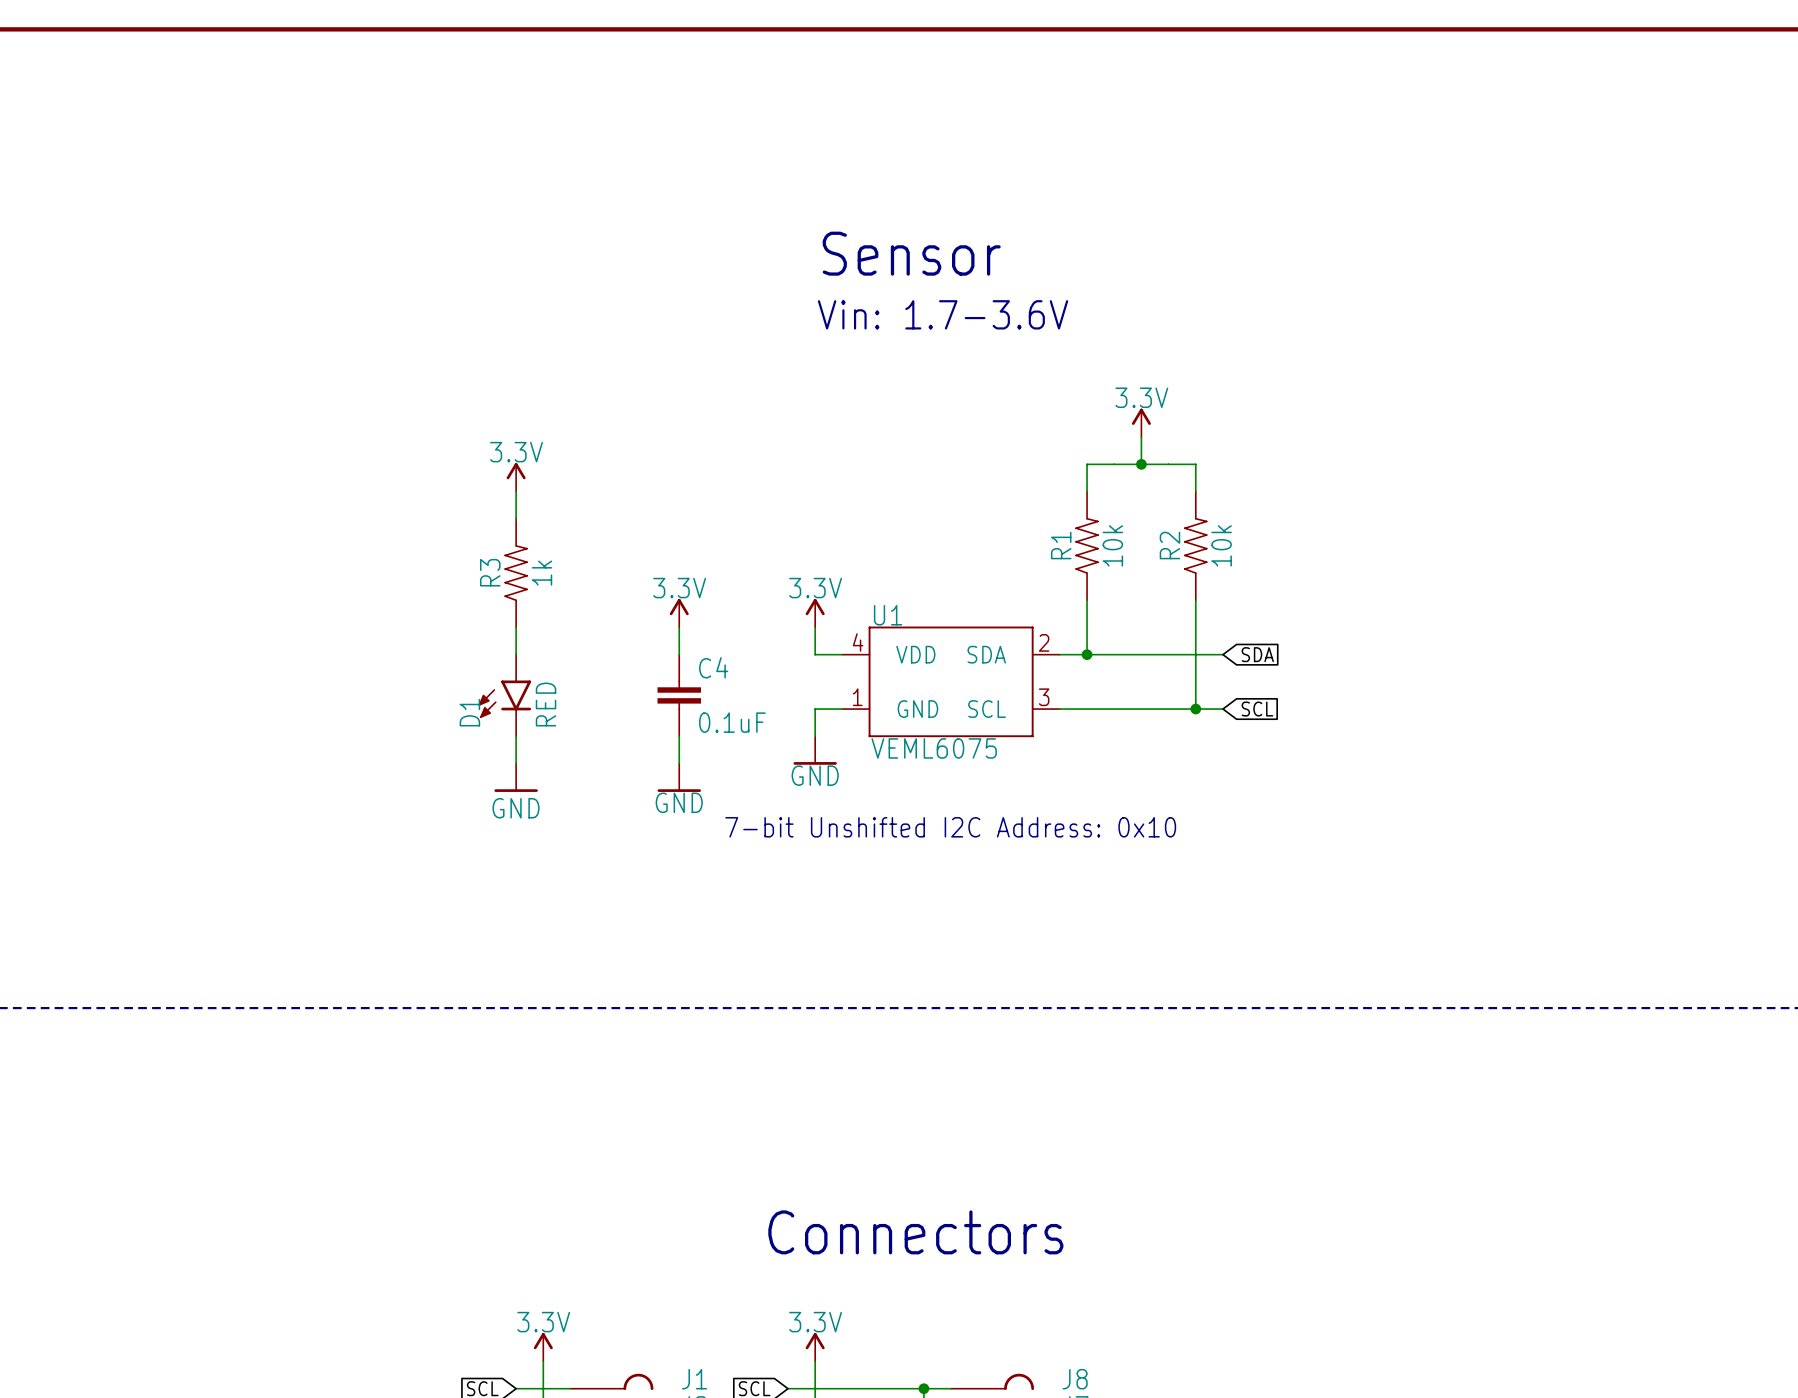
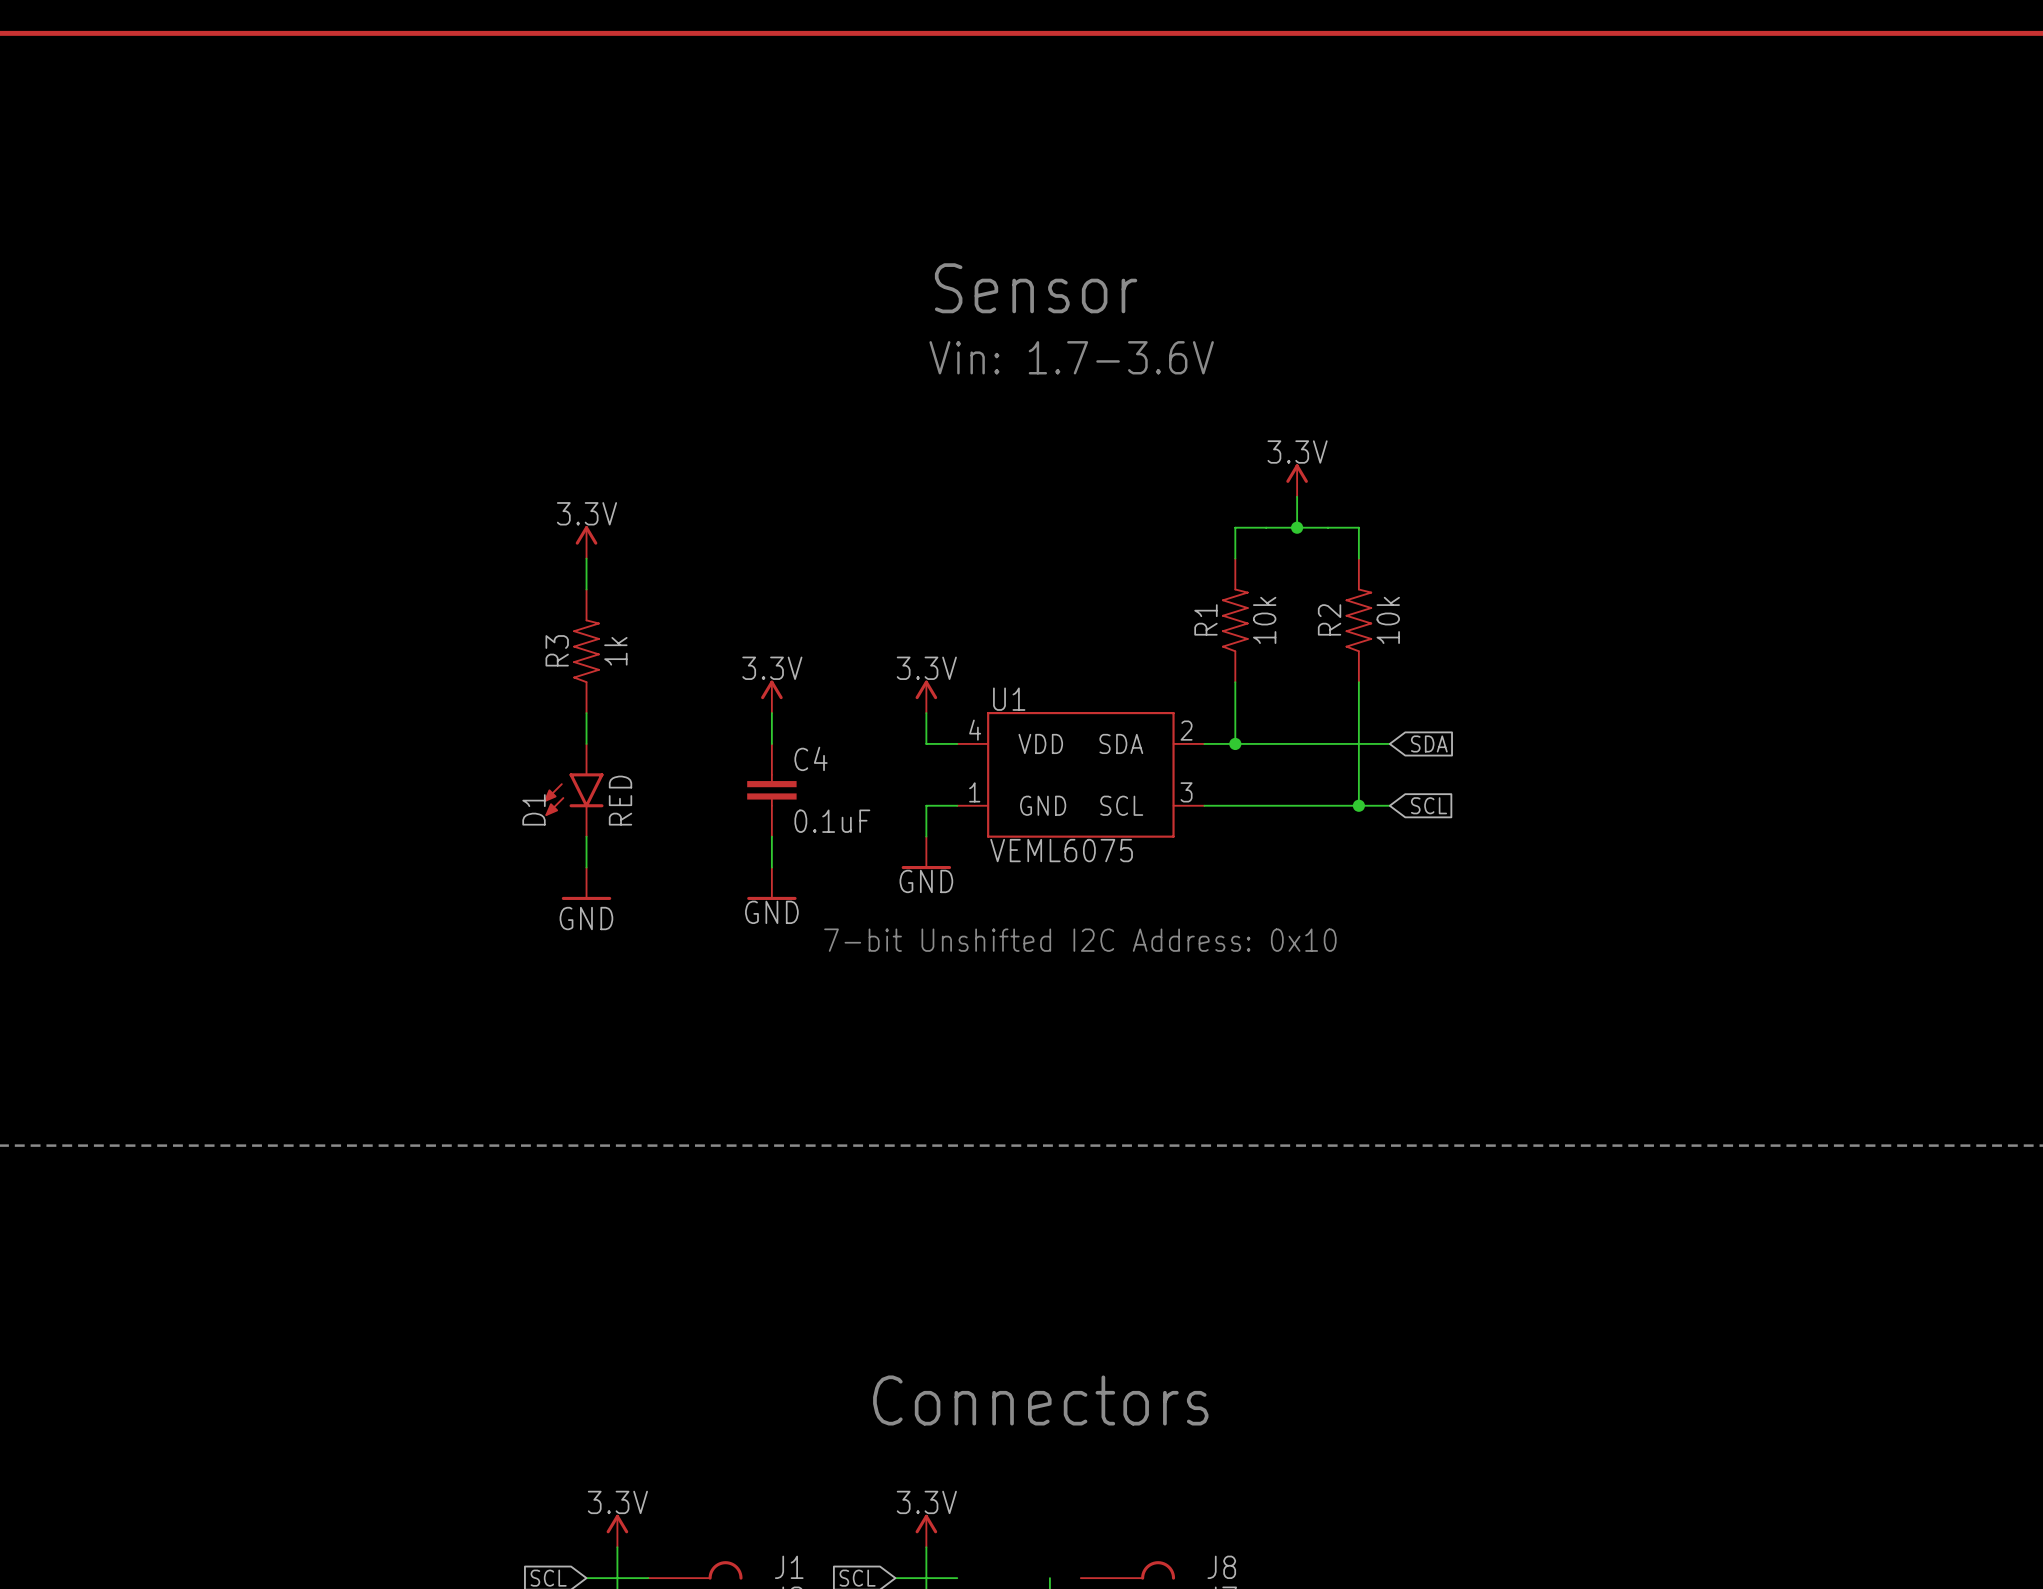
wire: (842, 1388) (951, 1388) -> none
junction: (923, 1388) -> none

